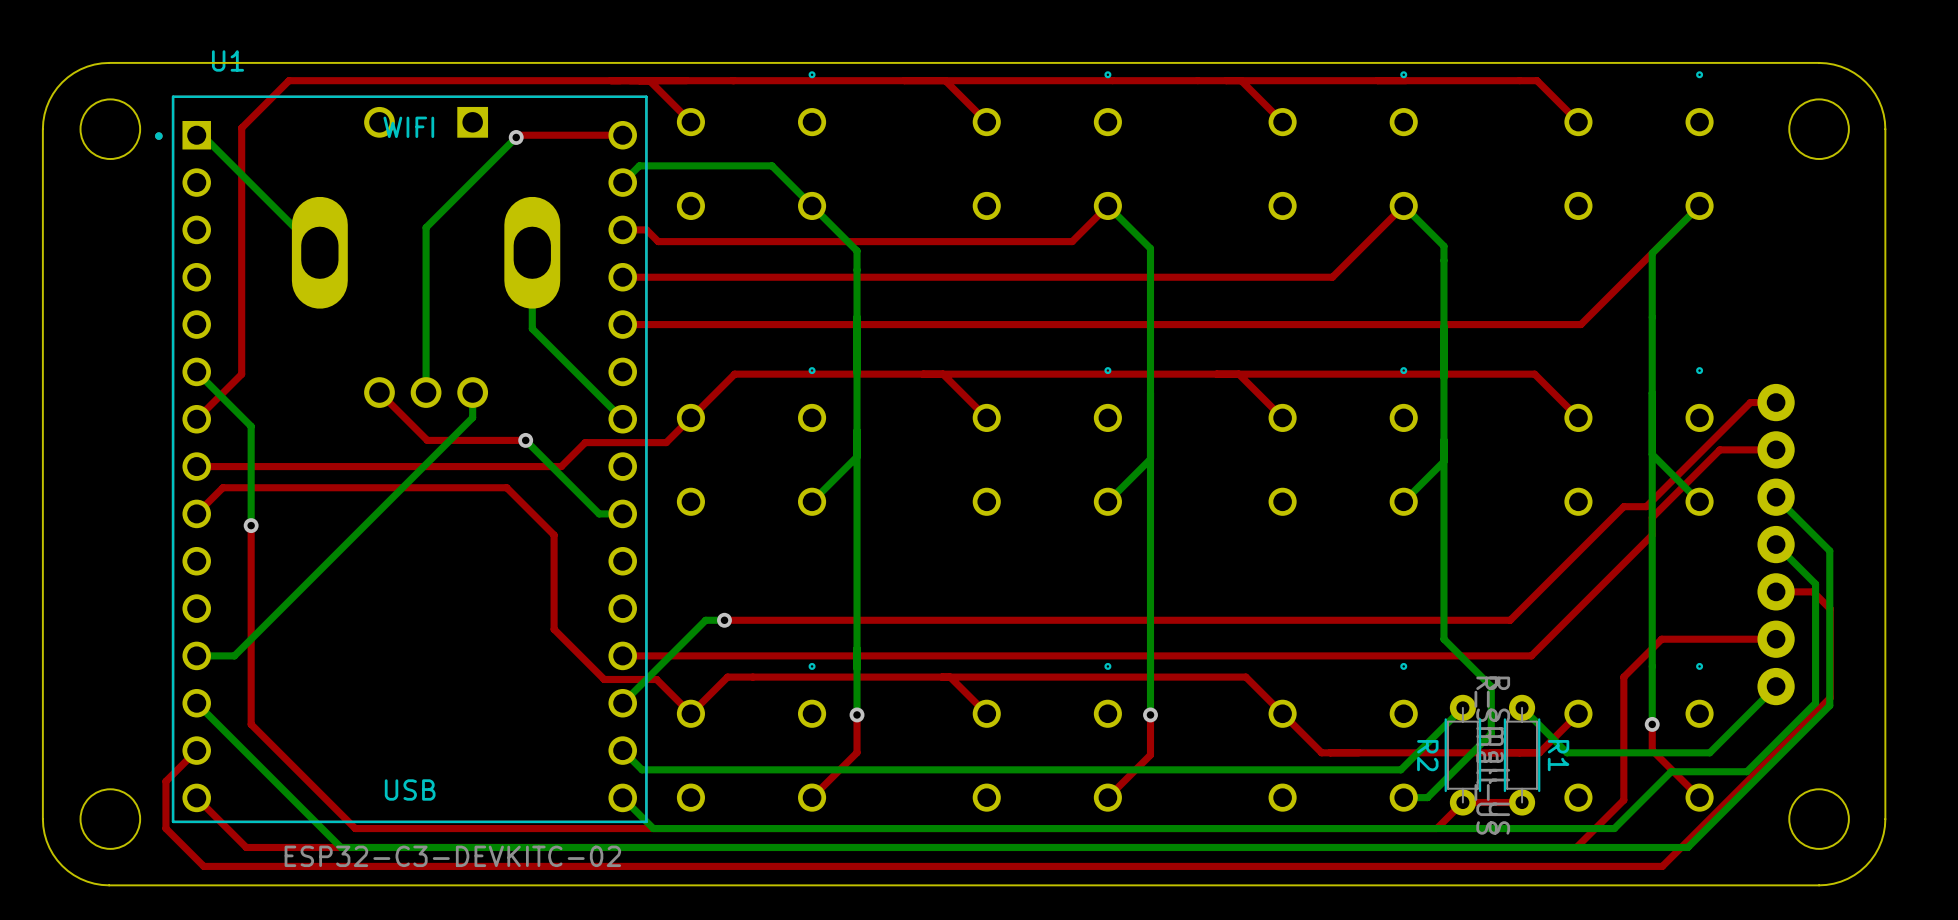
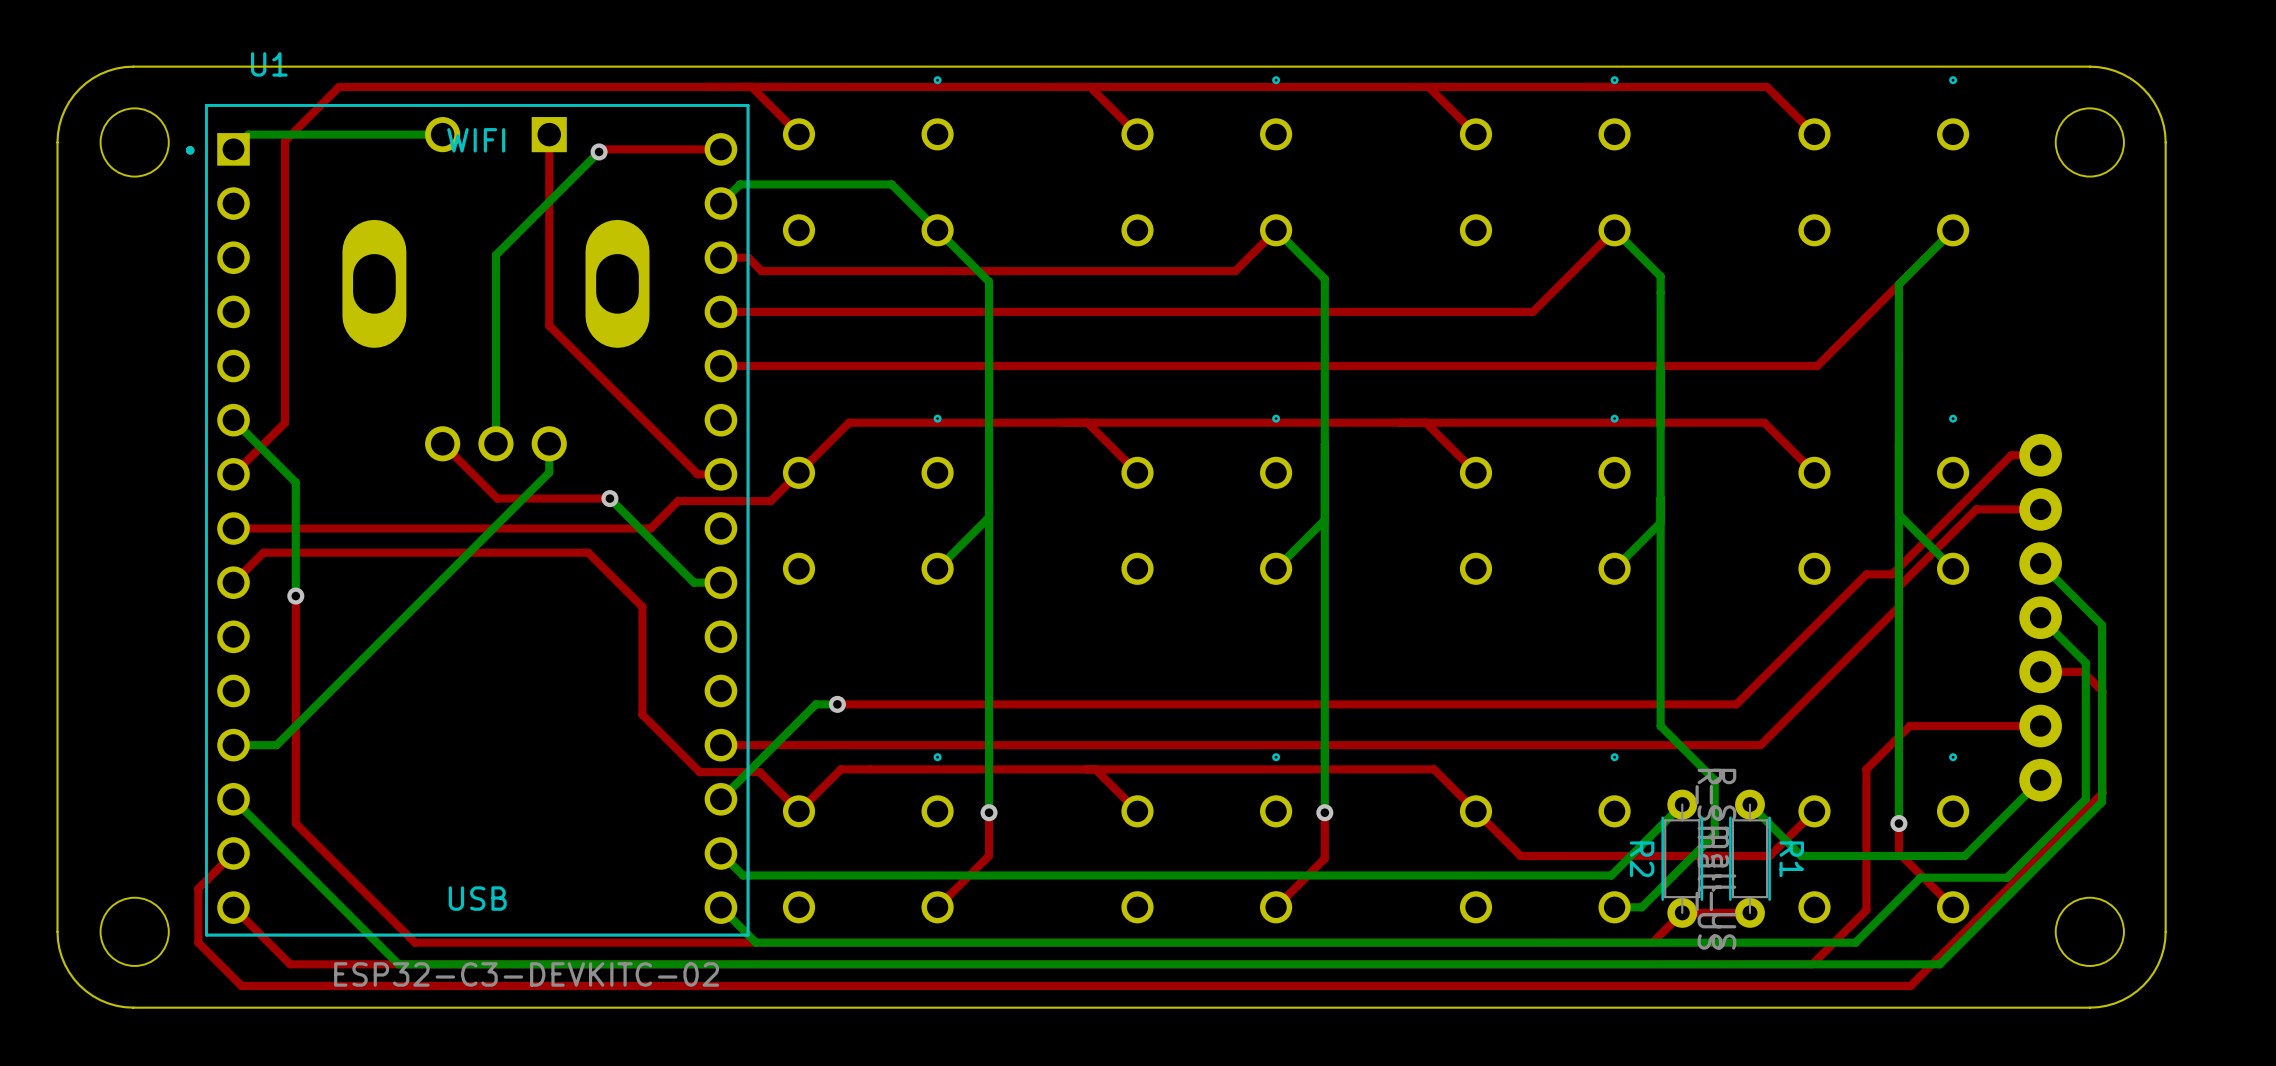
bottom track: none -> (442, 134) (248, 134) (233, 149)
top track: none -> (549, 134) (549, 325) (697, 474) (720, 474)
bottom track: (202, 135) (319, 252) -> none
bottom track: (532, 252) (532, 328) (622, 419) -> none

